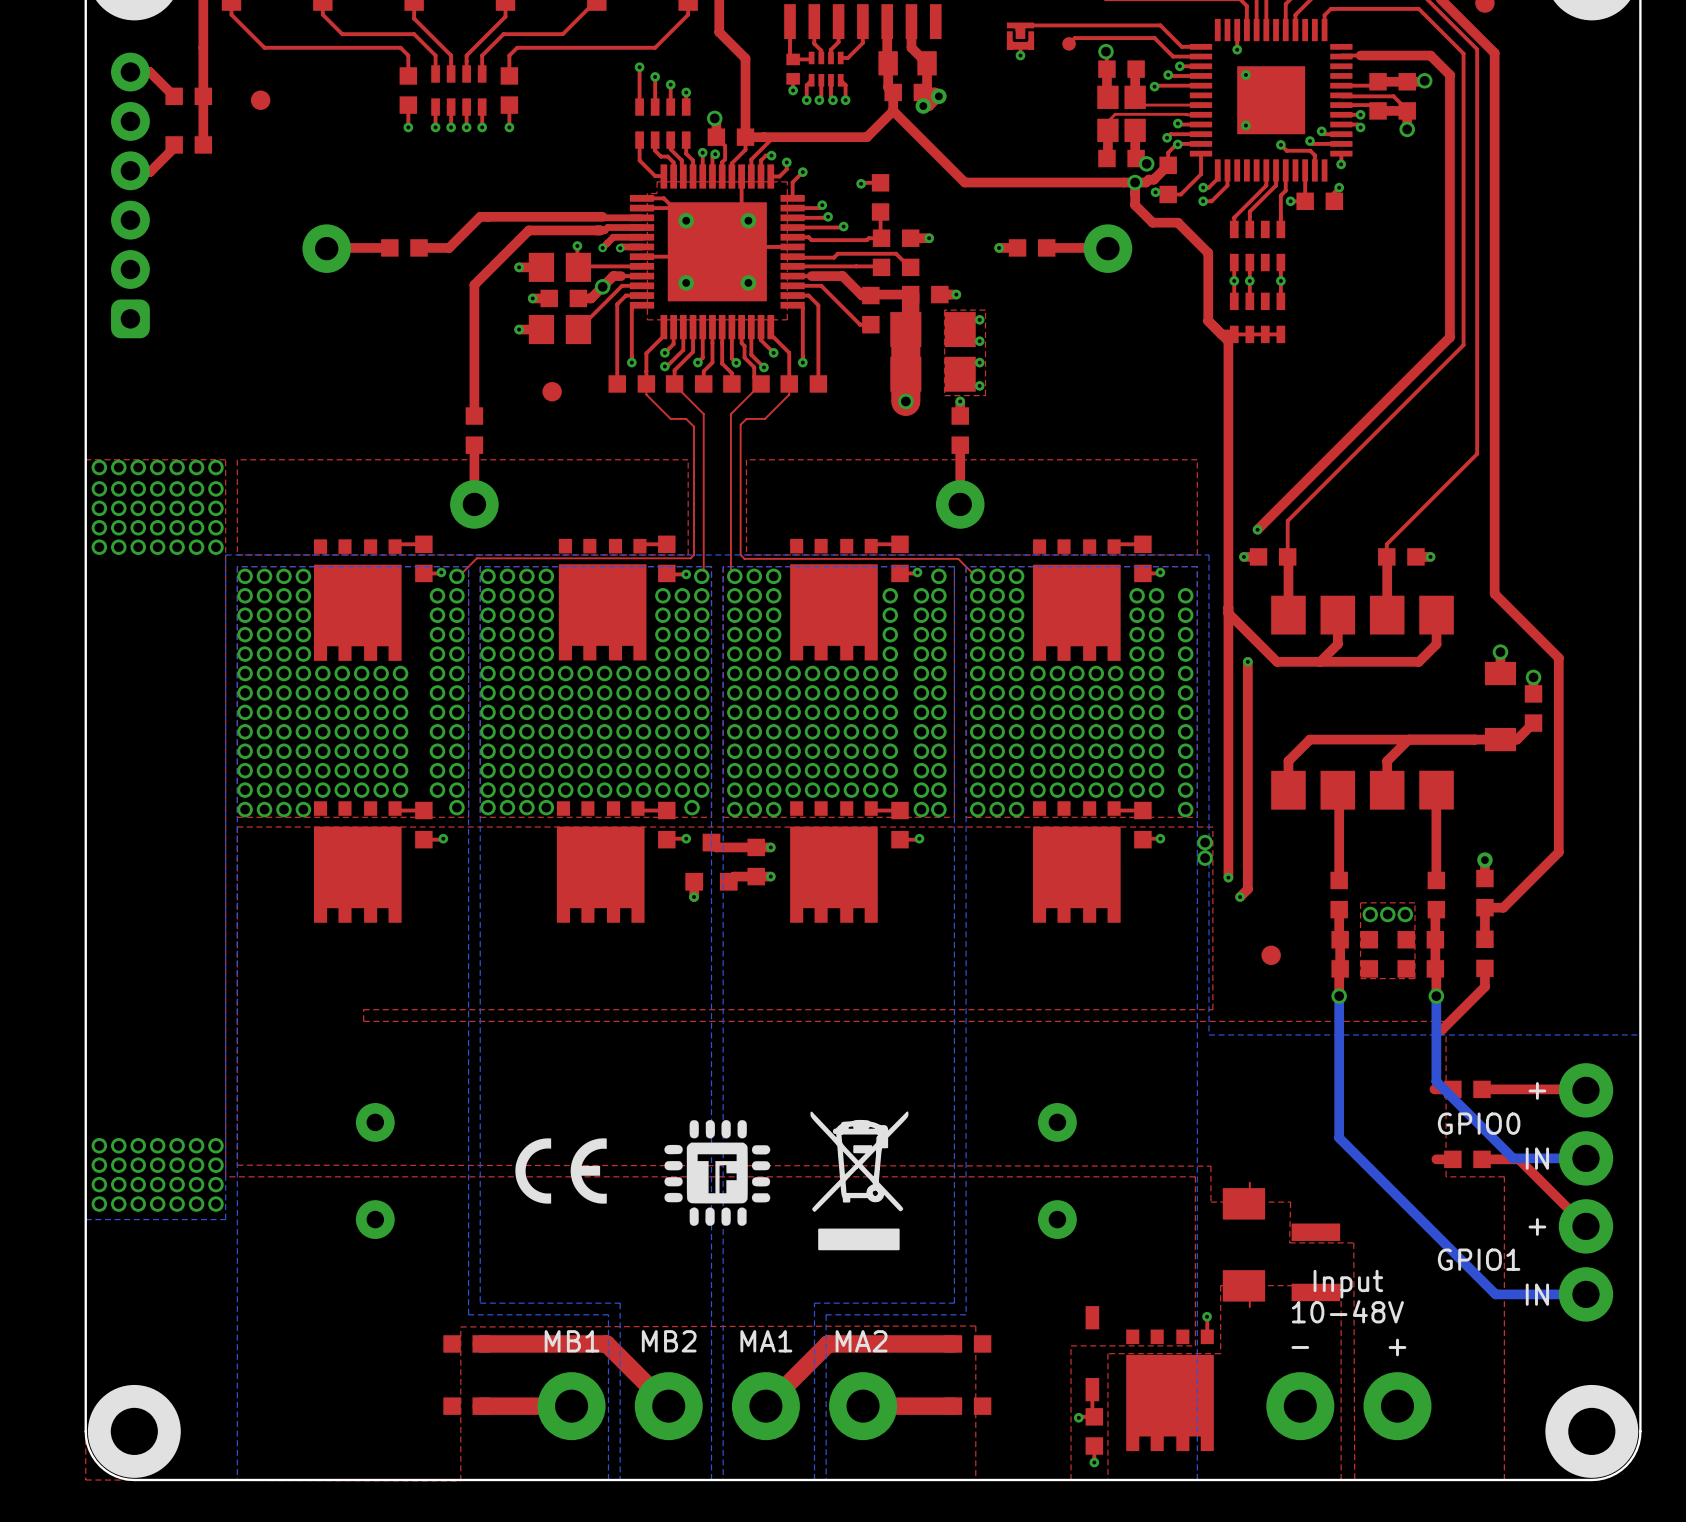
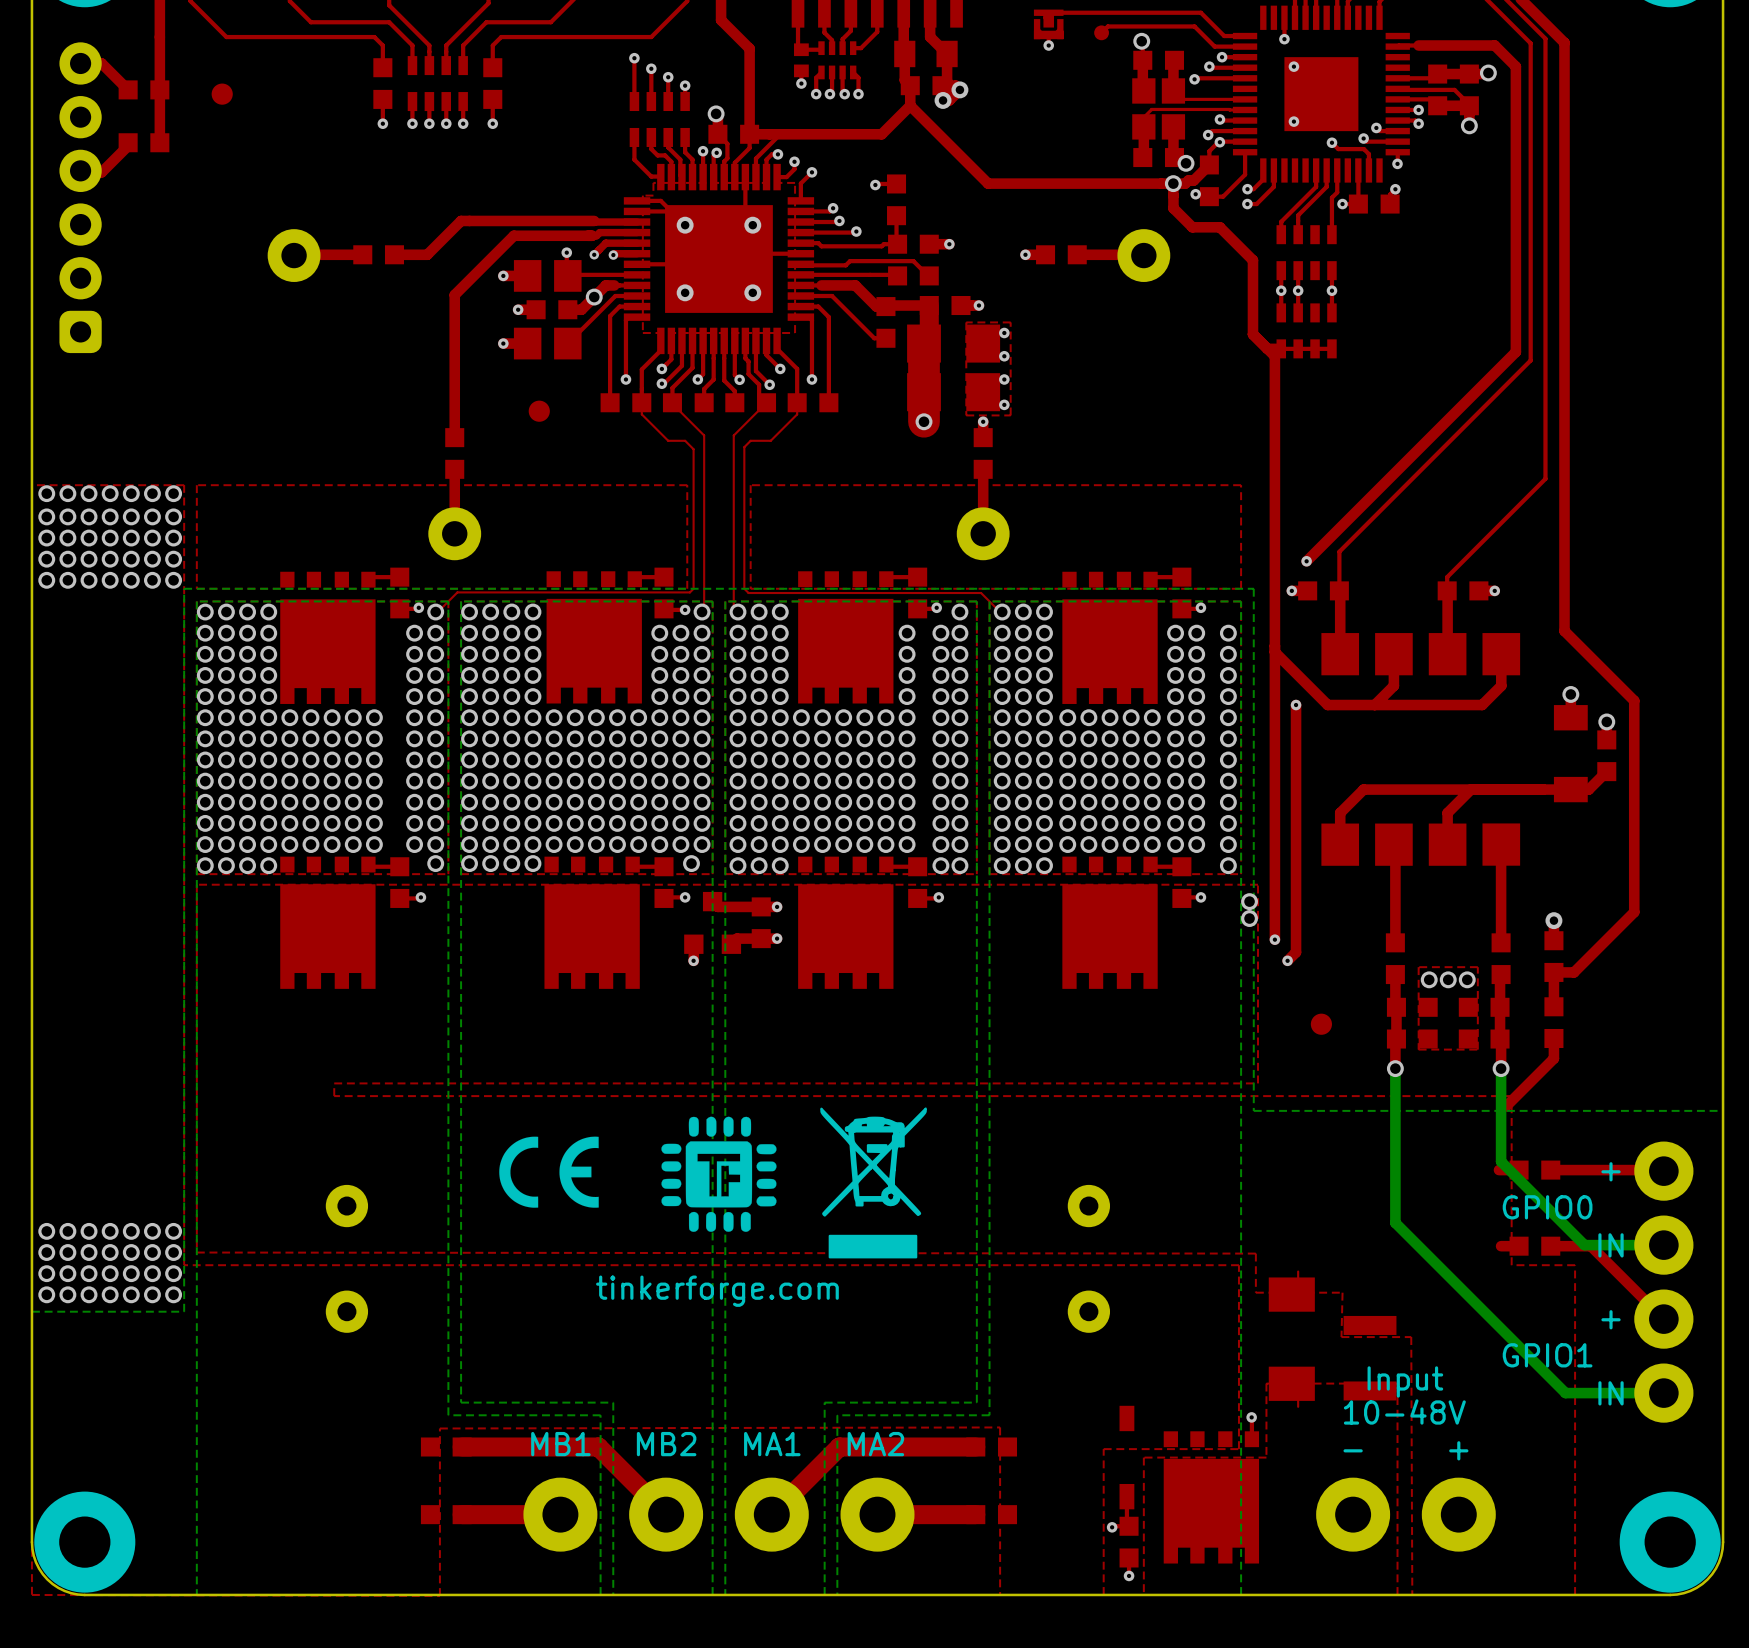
drawing position: (561, 1170) -> (548, 1172)
drawing position: (717, 1172) -> (718, 1174)
drawing position: (859, 1180) -> (873, 1182)
text: none -> tinkerforge.com (717, 1291)

